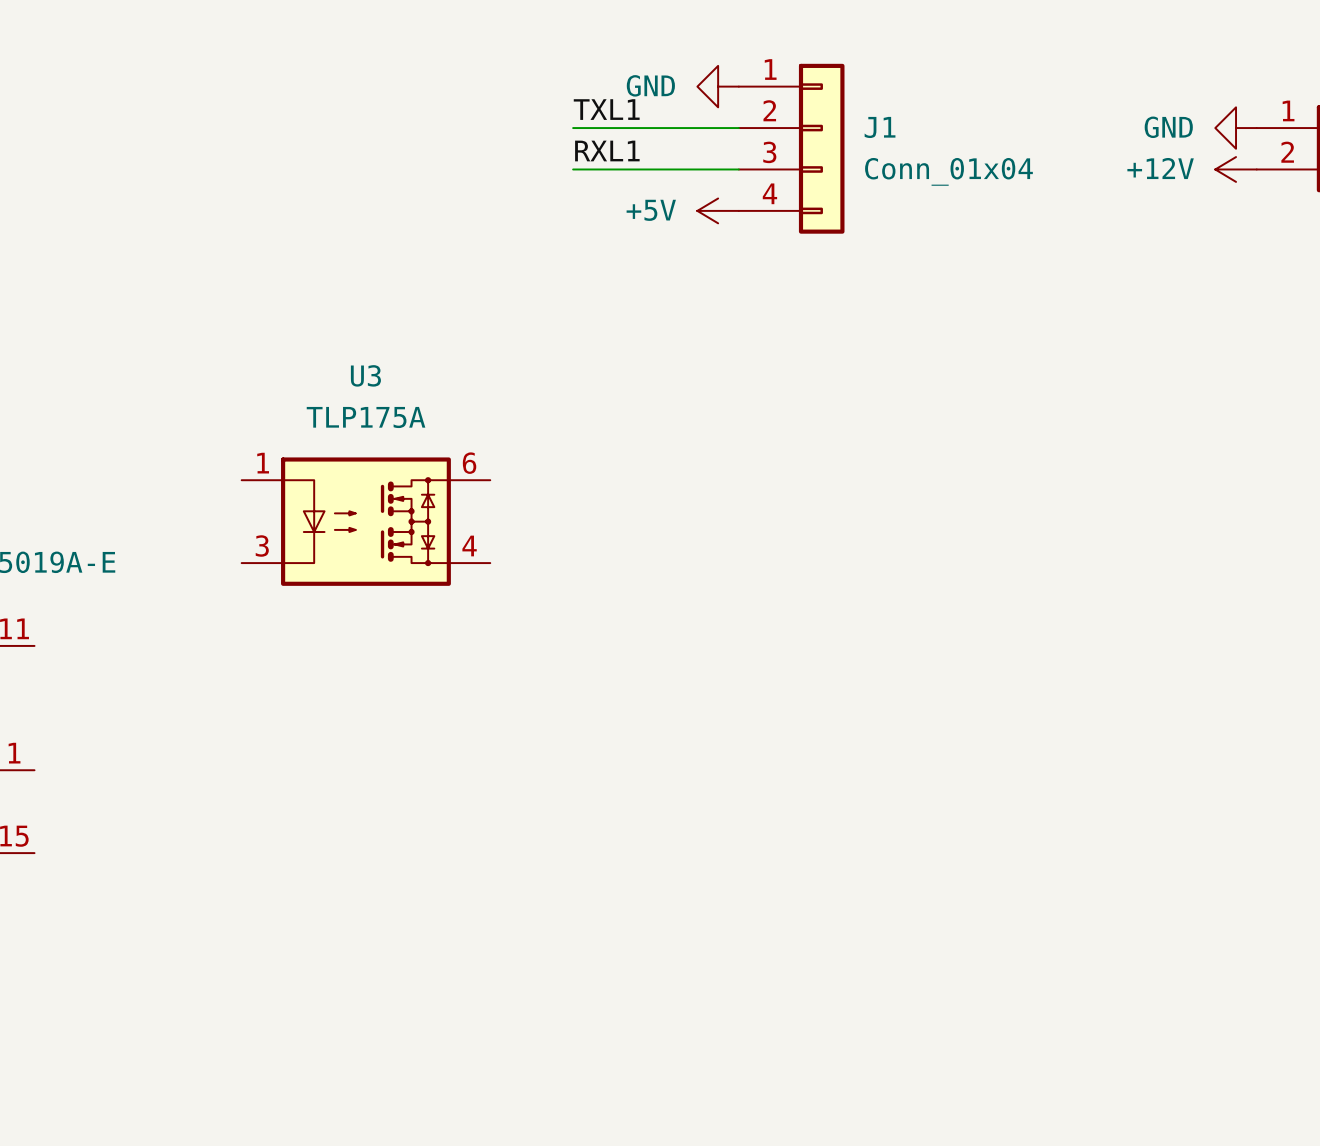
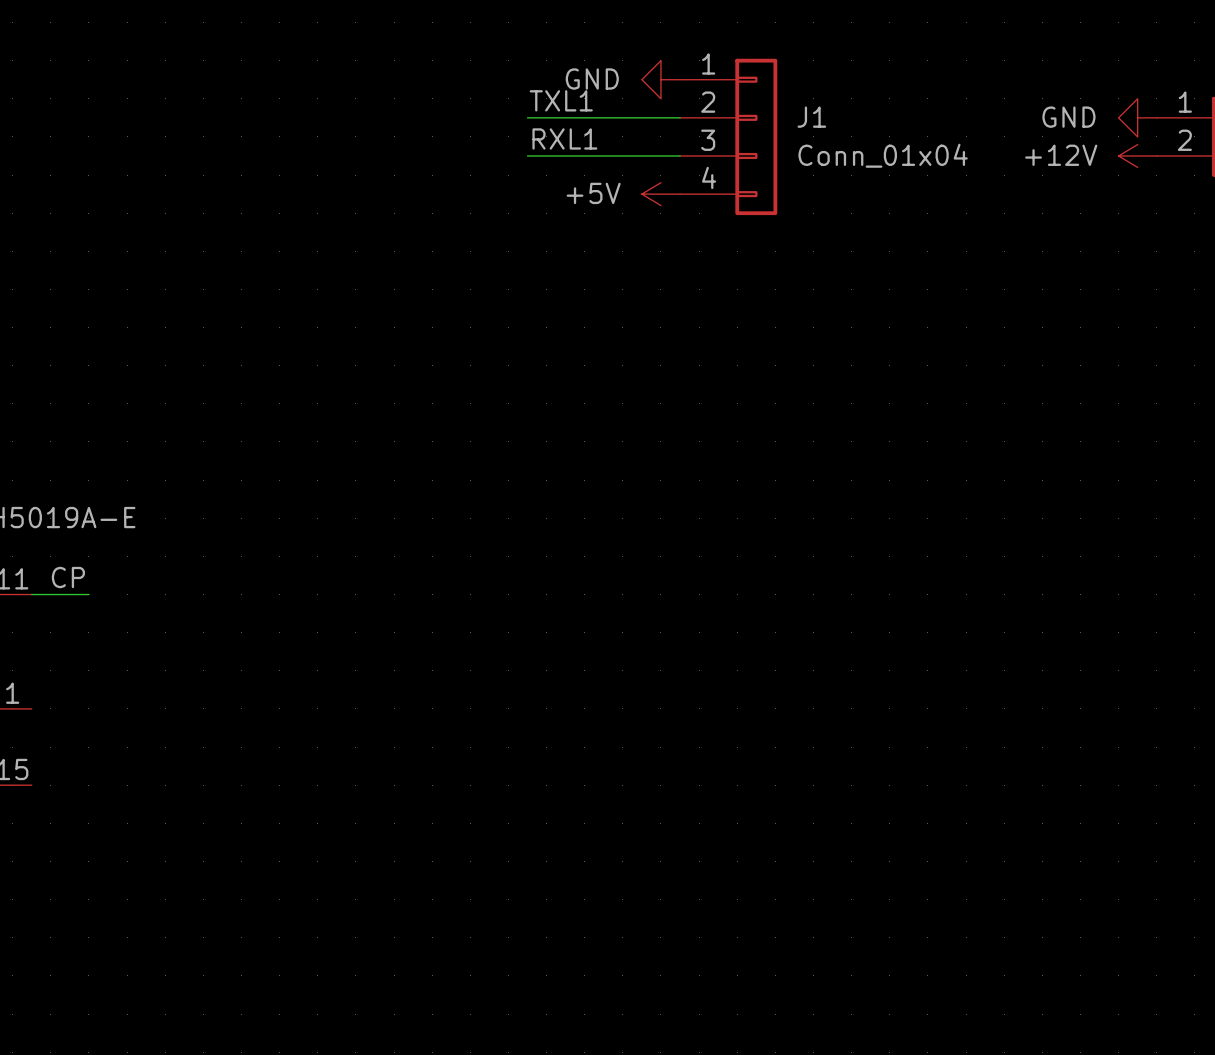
U3: TLP175A (365, 521) -> none
label: none -> CP (68, 577)
wire: none -> (31, 594) (88, 594)

